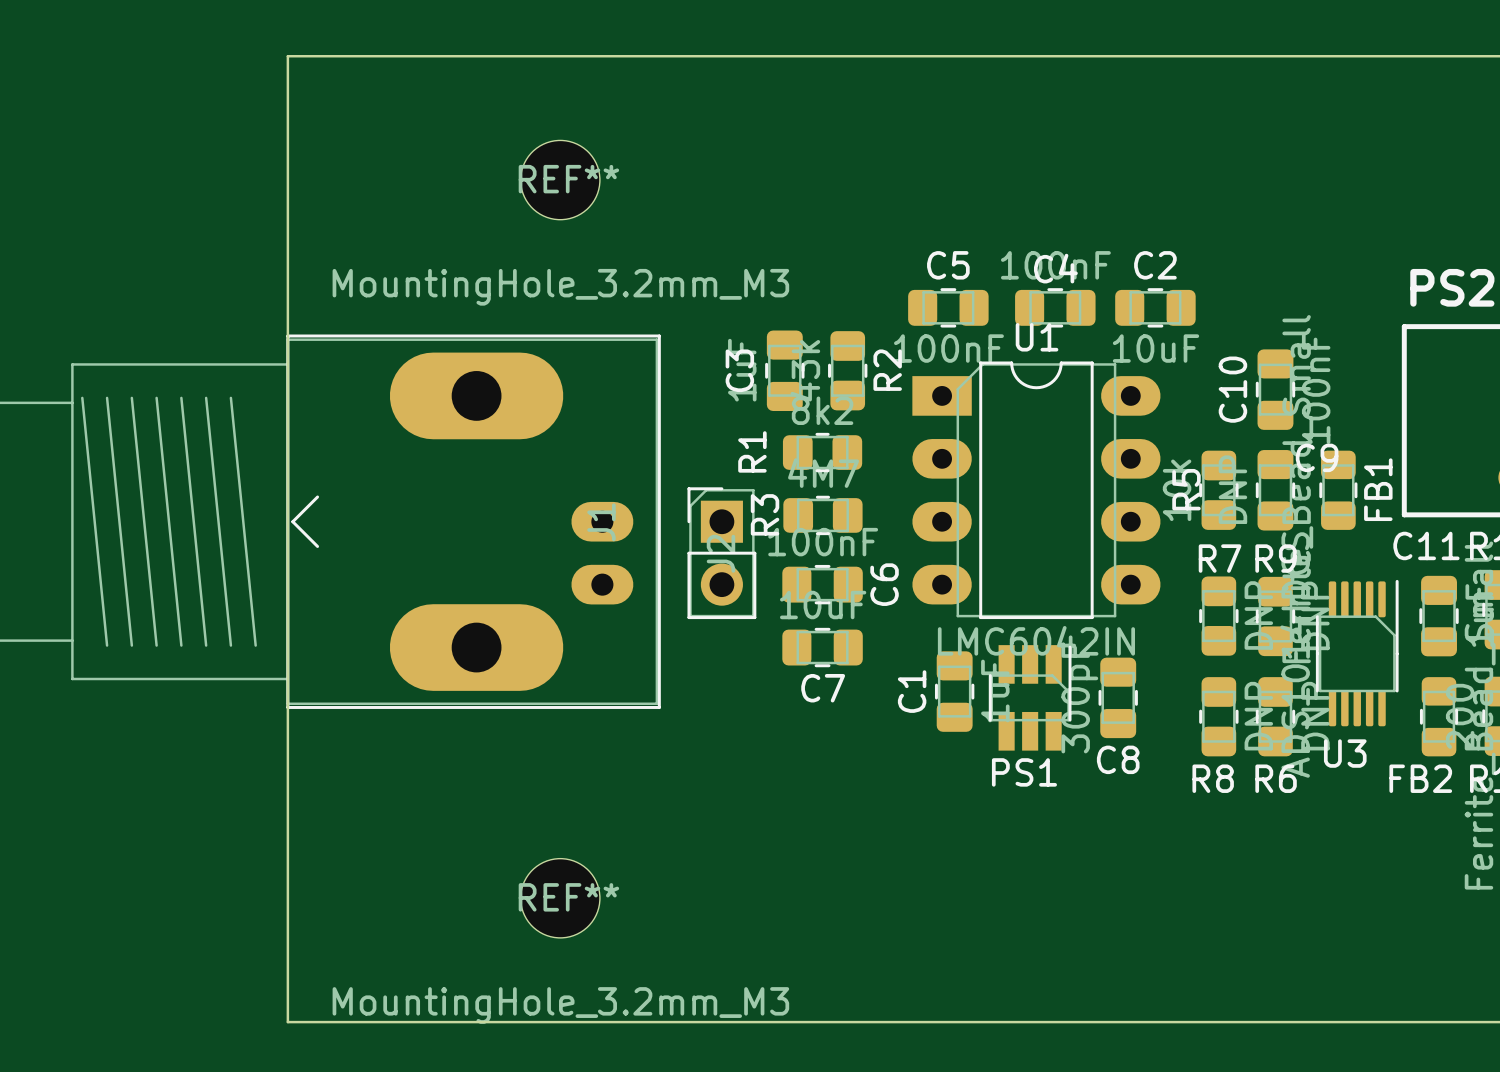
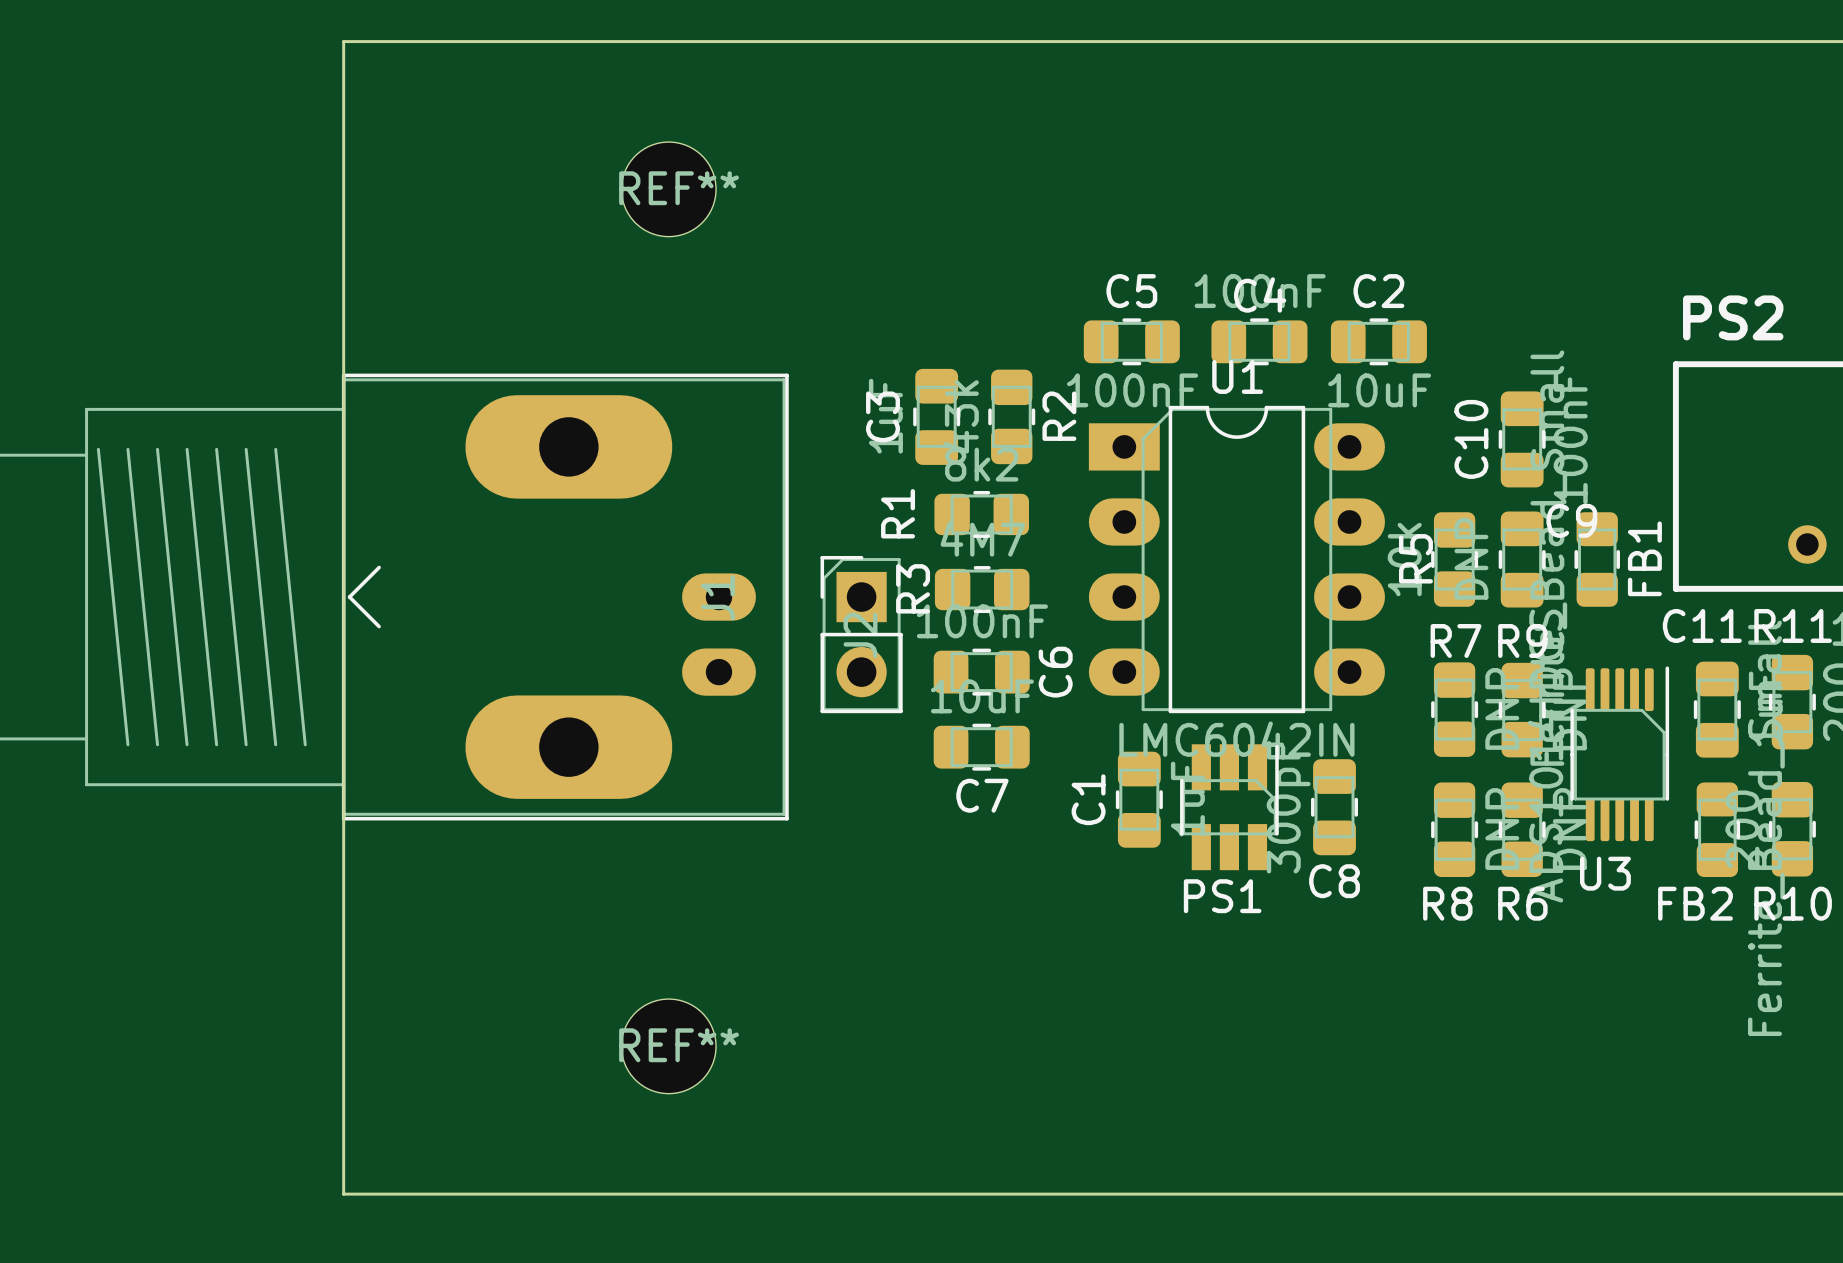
REF** value: MountingHole_3.2mm_M3 (560, 287) -> none
REF** value: MountingHole_3.2mm_M3 (560, 1005) -> none

